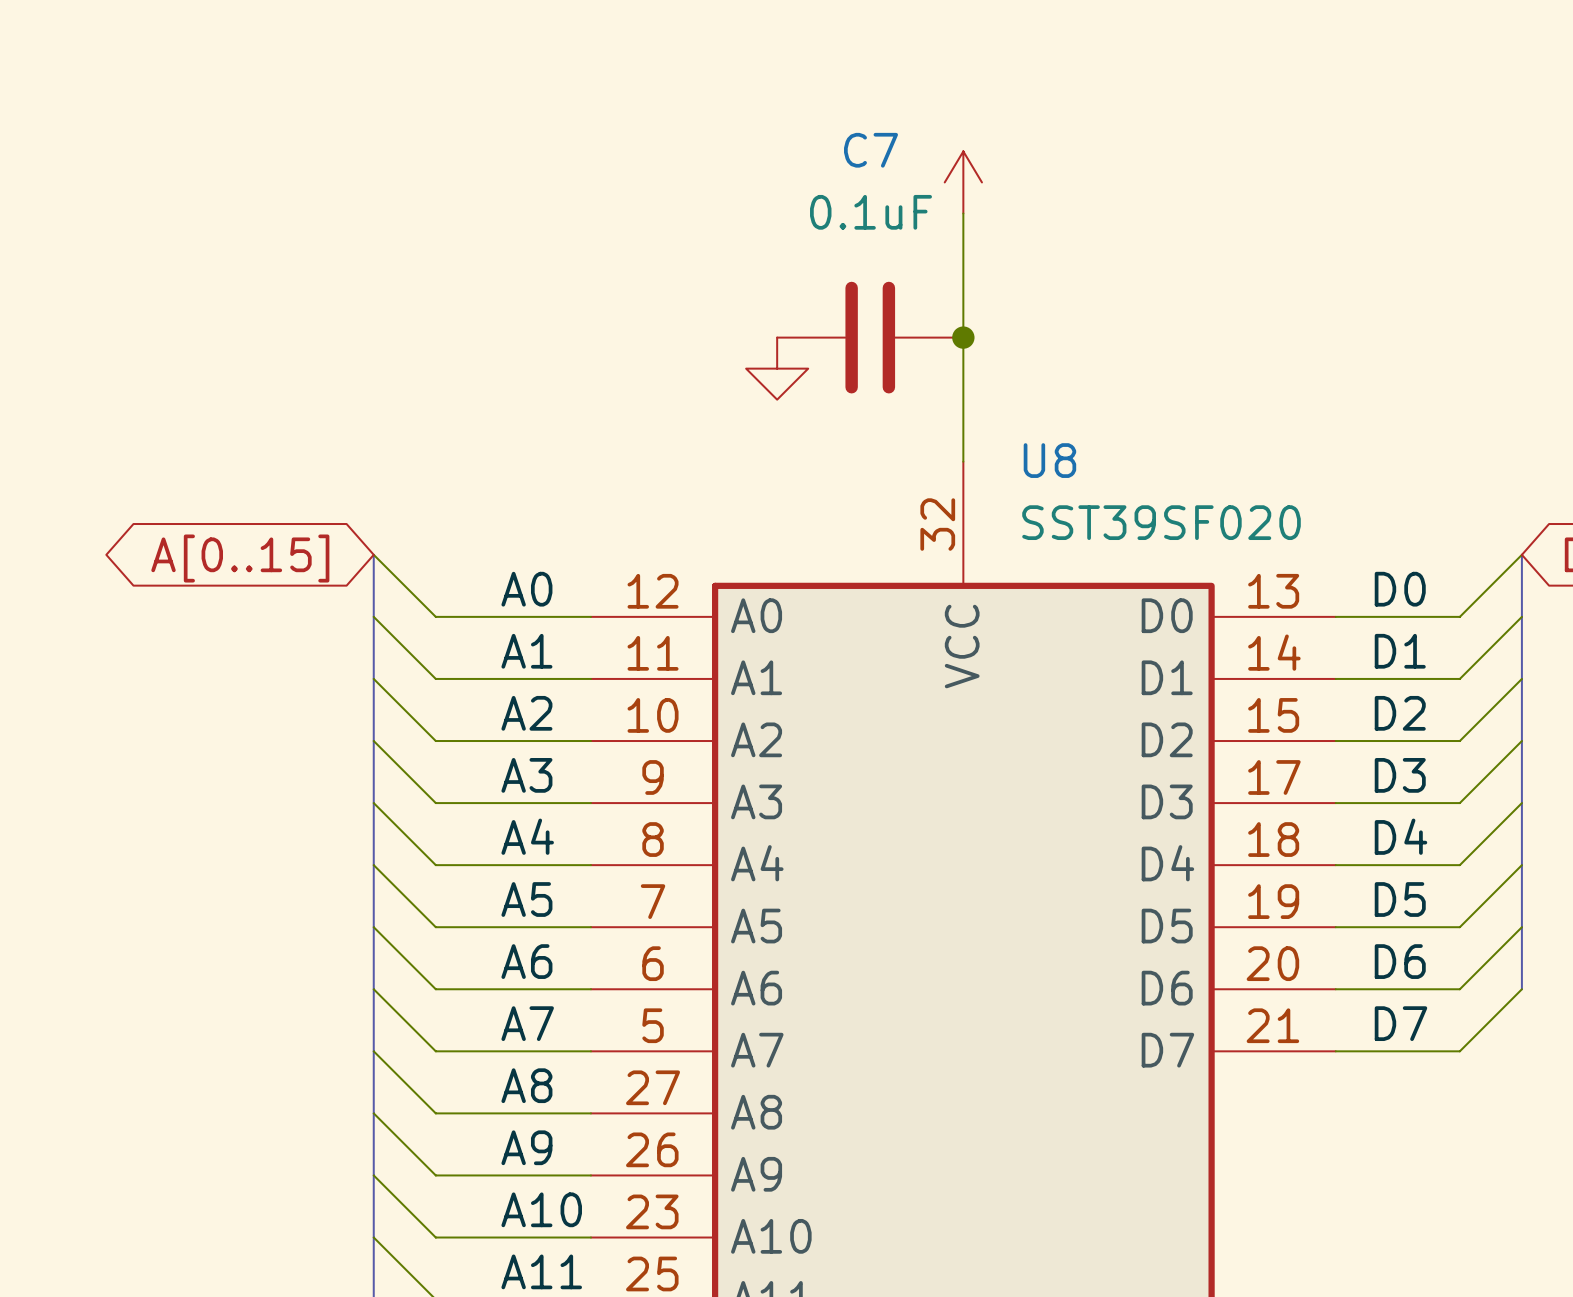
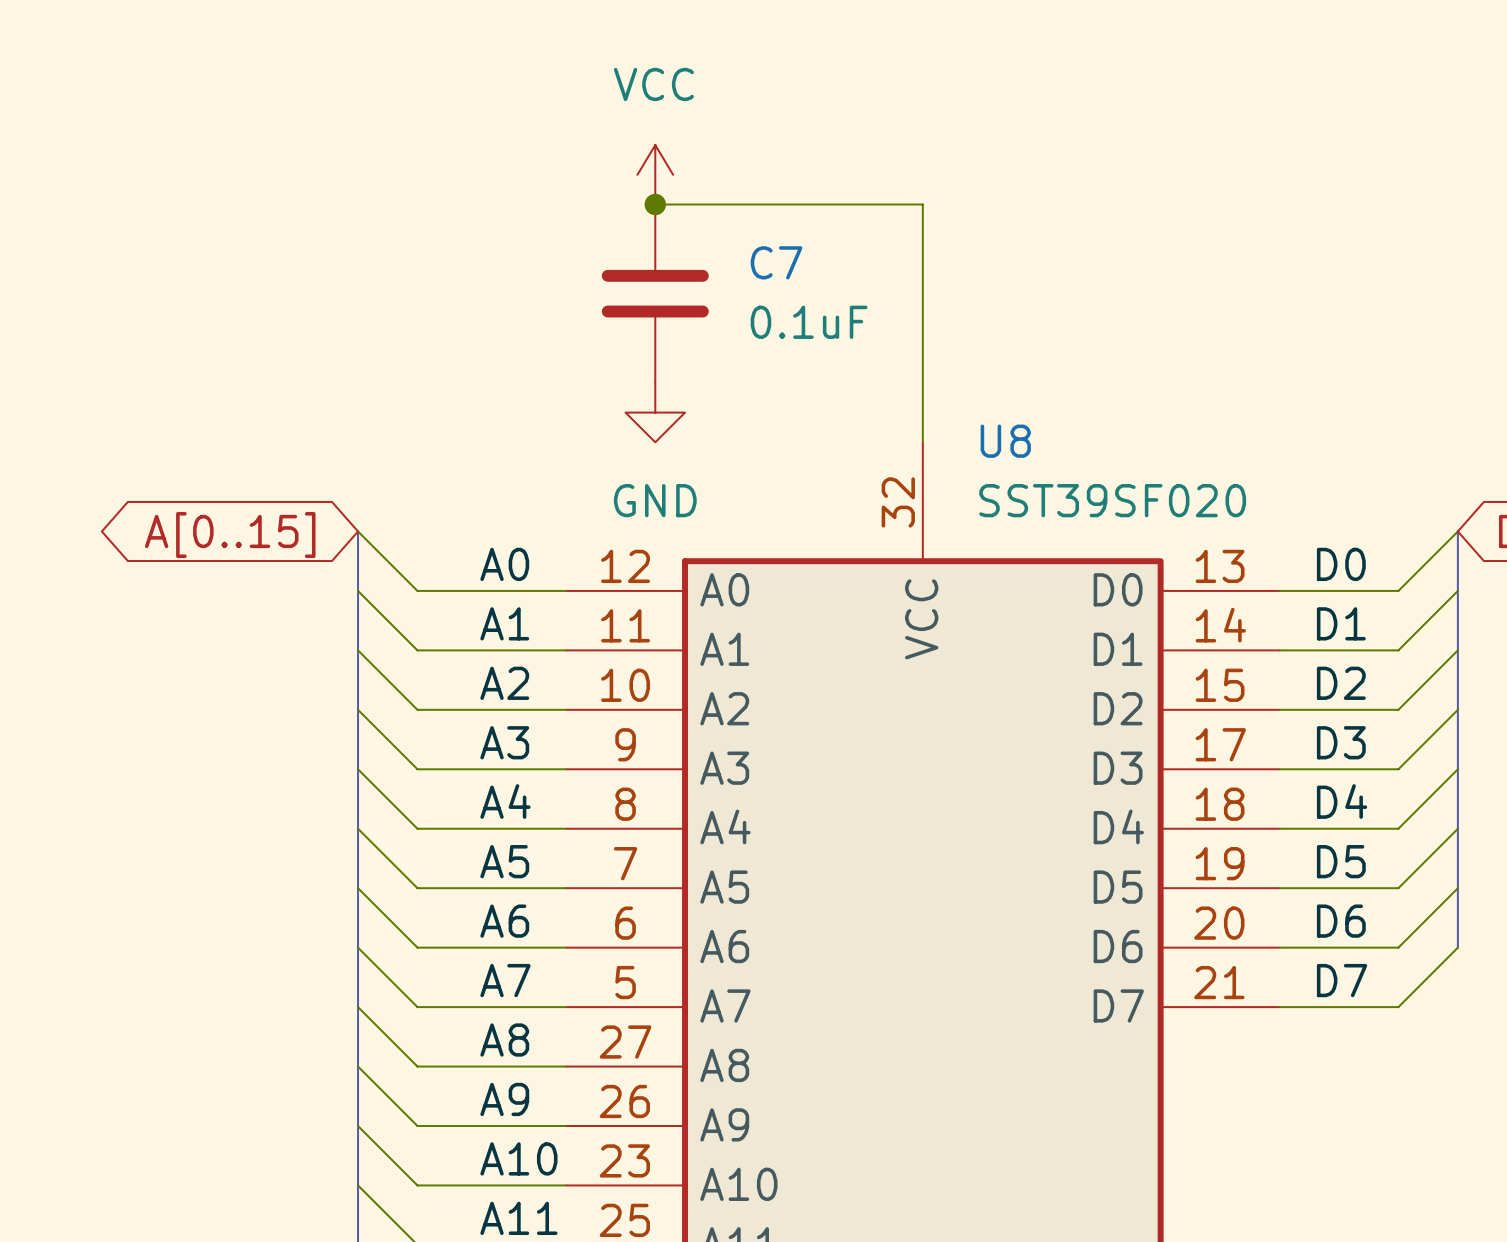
C7 name position: C7 (870, 150) -> C7 (776, 262)
power symbol: none -> VCC (655, 174)
power symbol: (963, 182) -> none
C7 value position: 0.1uF (870, 212) -> 0.1uF (809, 322)
wire: none -> (655, 204) (922, 204)
junction: none -> (655, 204)
C7 rotation: 0° (870, 337) -> 90° clockwise (655, 293)
C7 position: (870, 337) -> (655, 293)
junction: (963, 337) -> none
power symbol: (777, 368) -> none
power symbol: none -> GND (655, 412)

